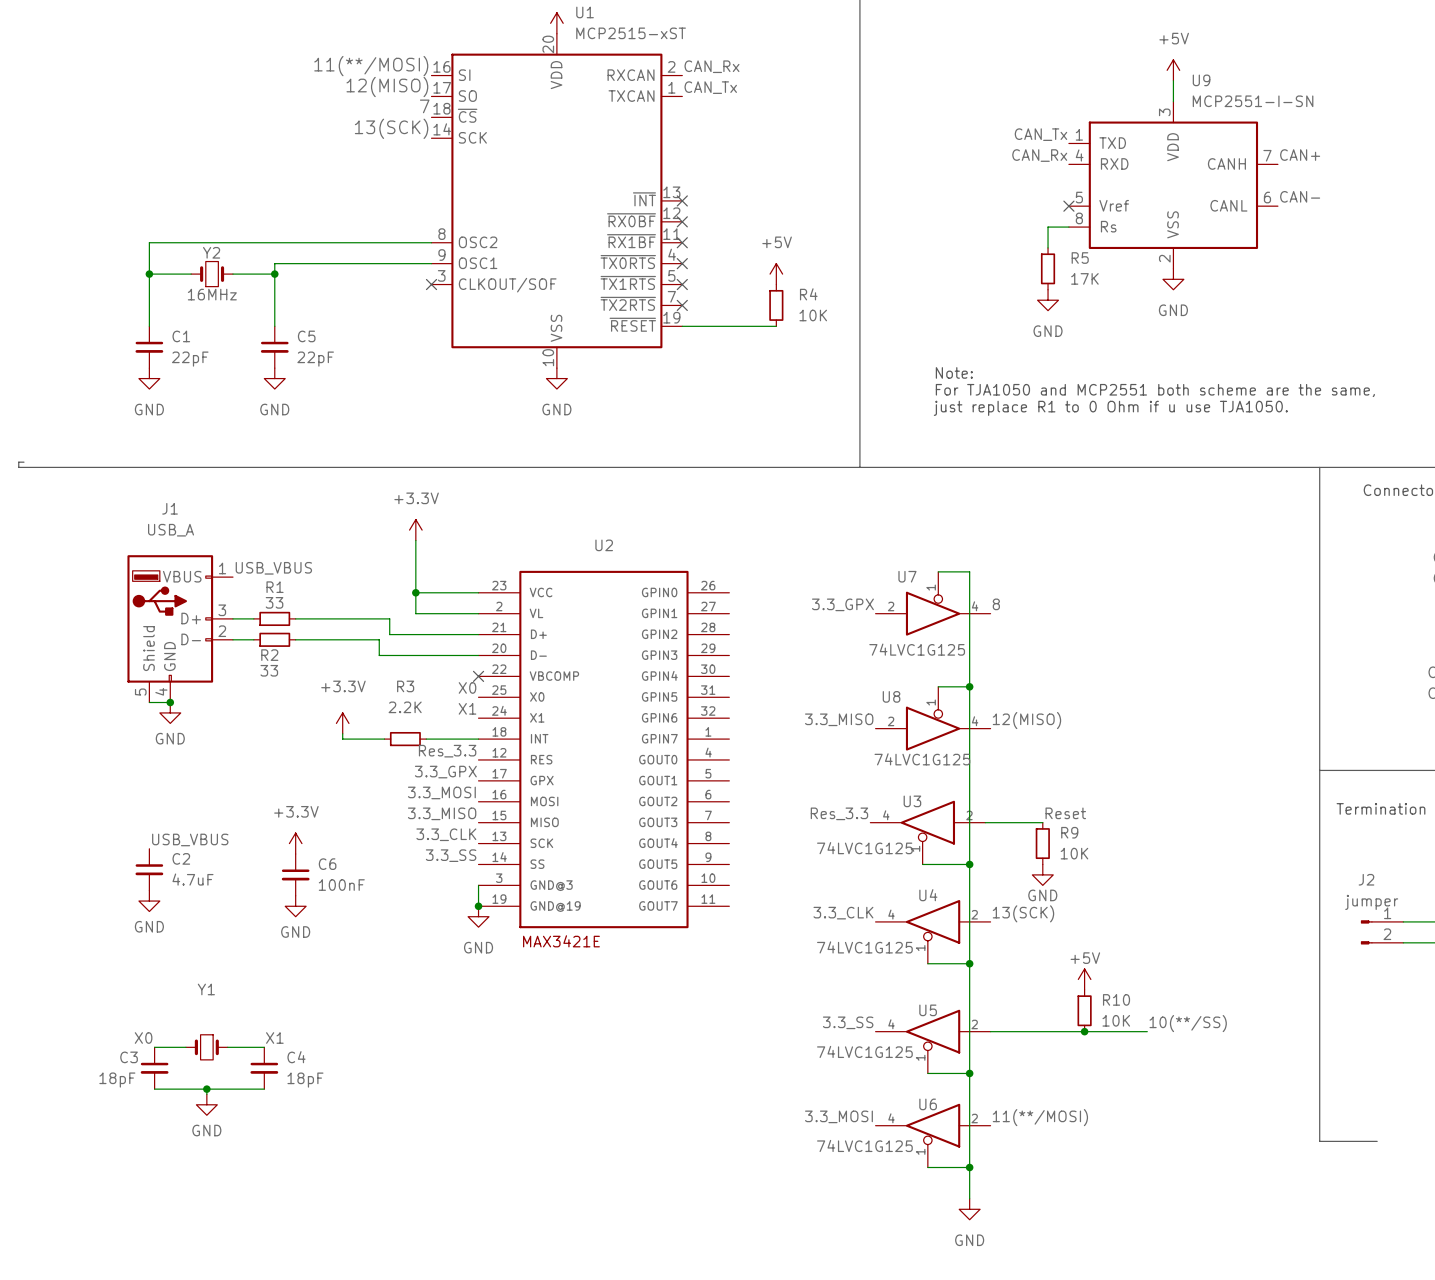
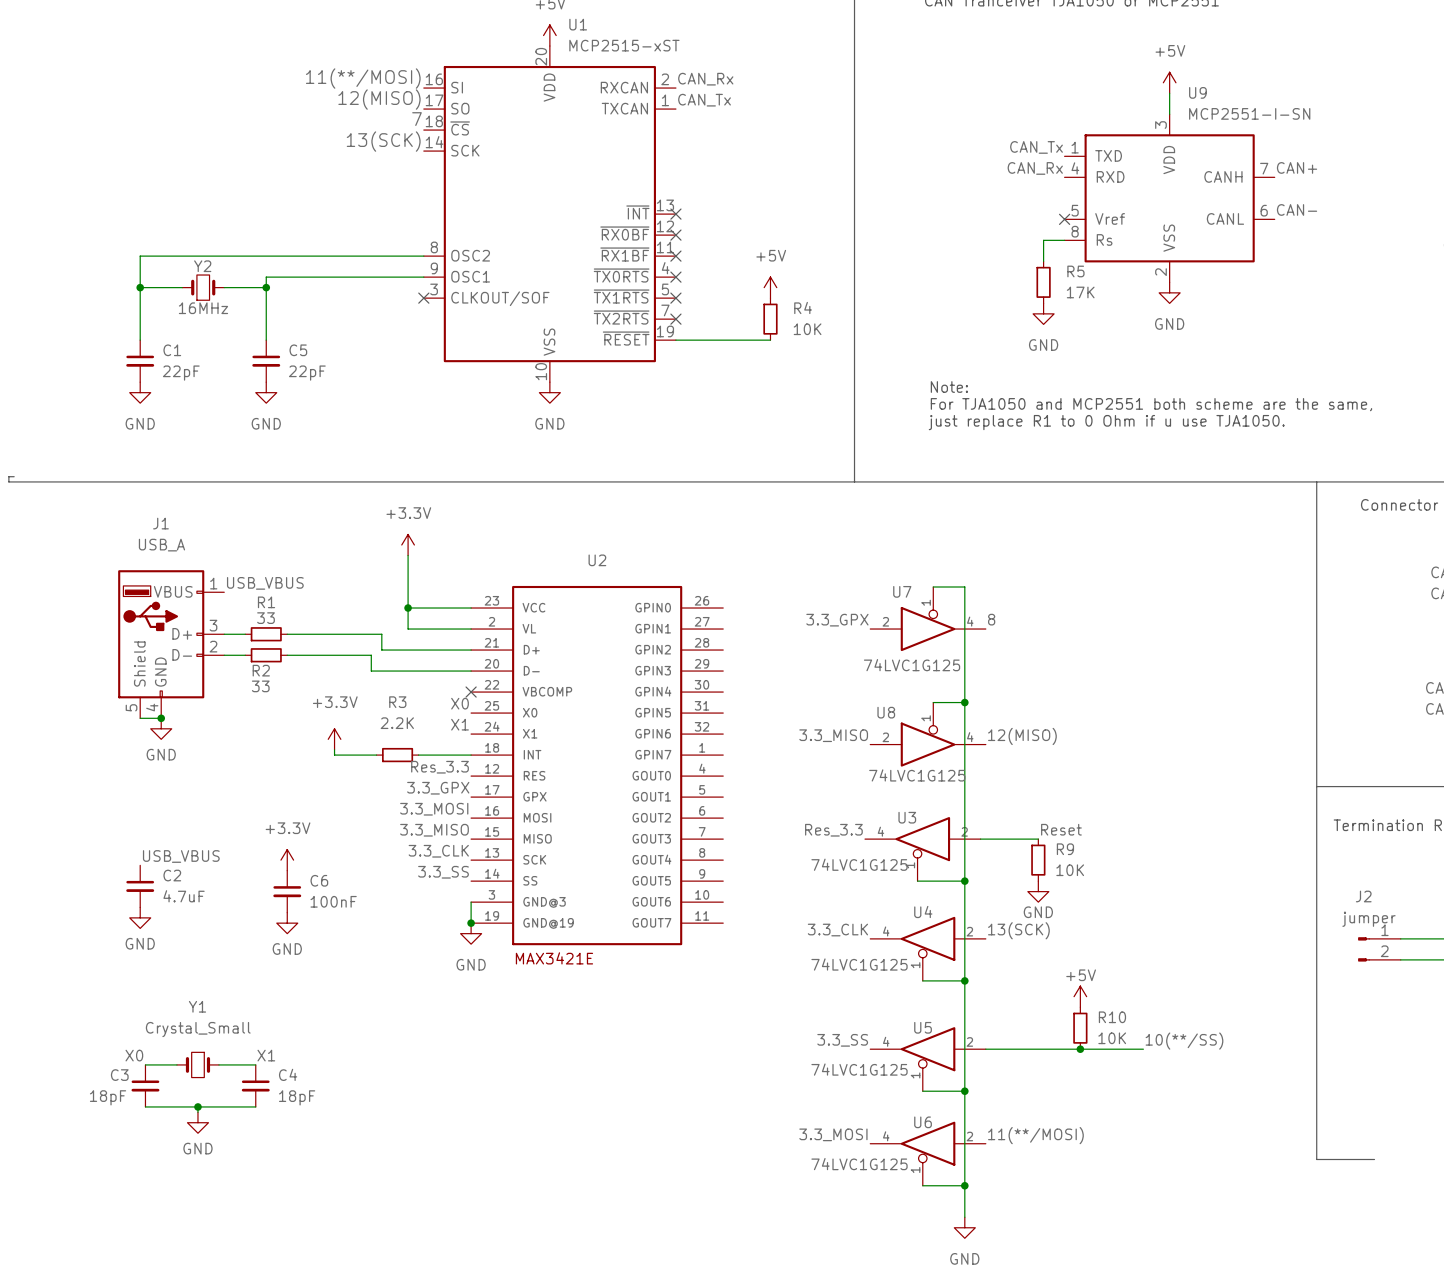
Y1 value: none -> Crystal_Small (198, 1029)

